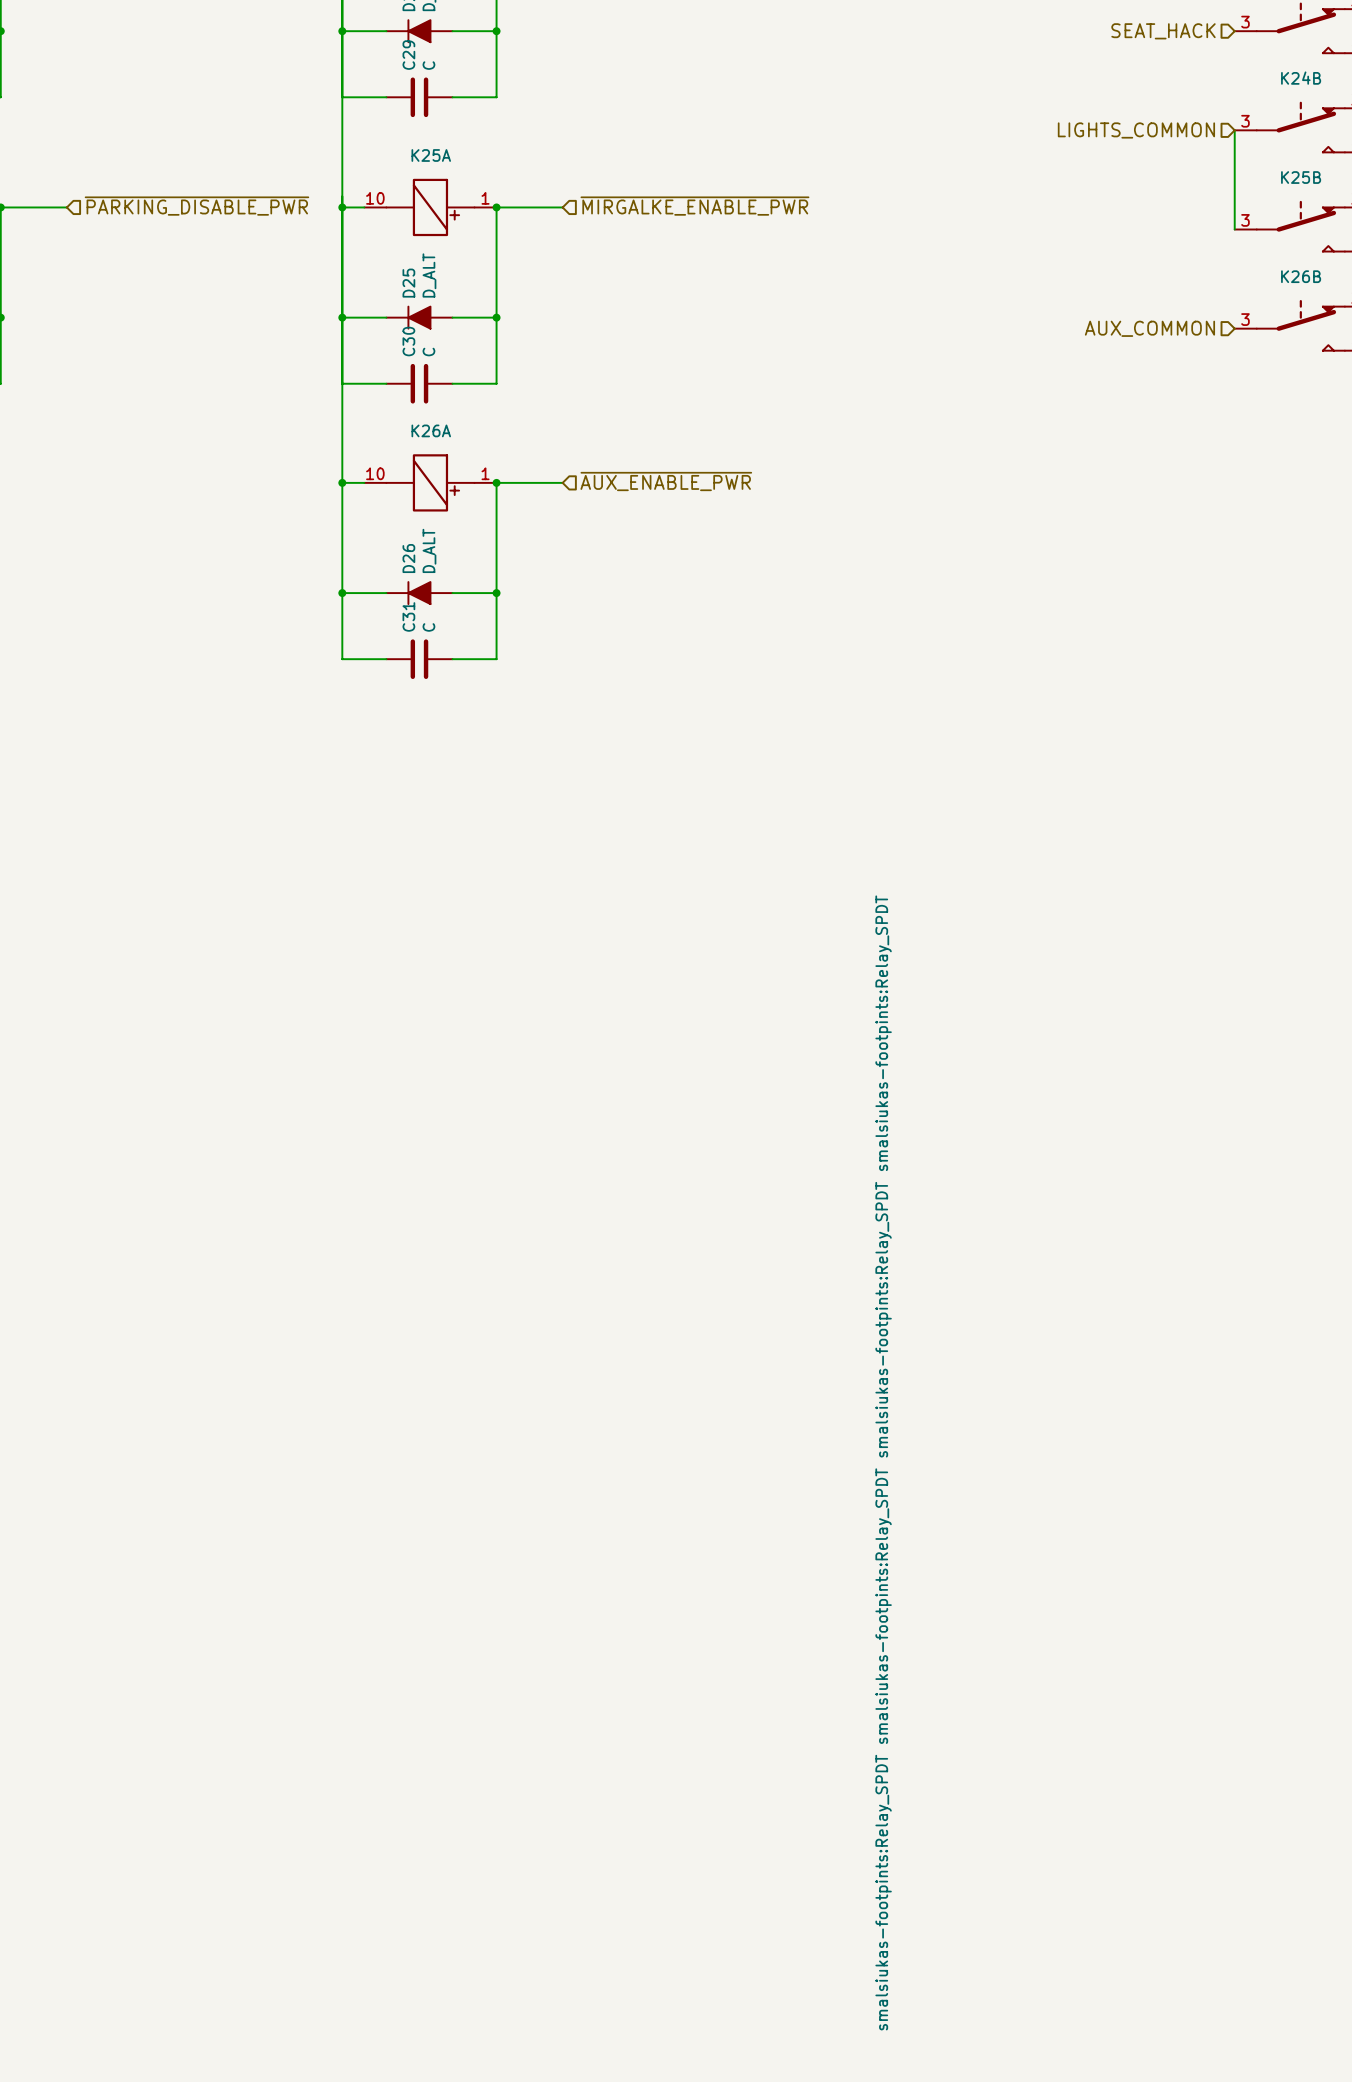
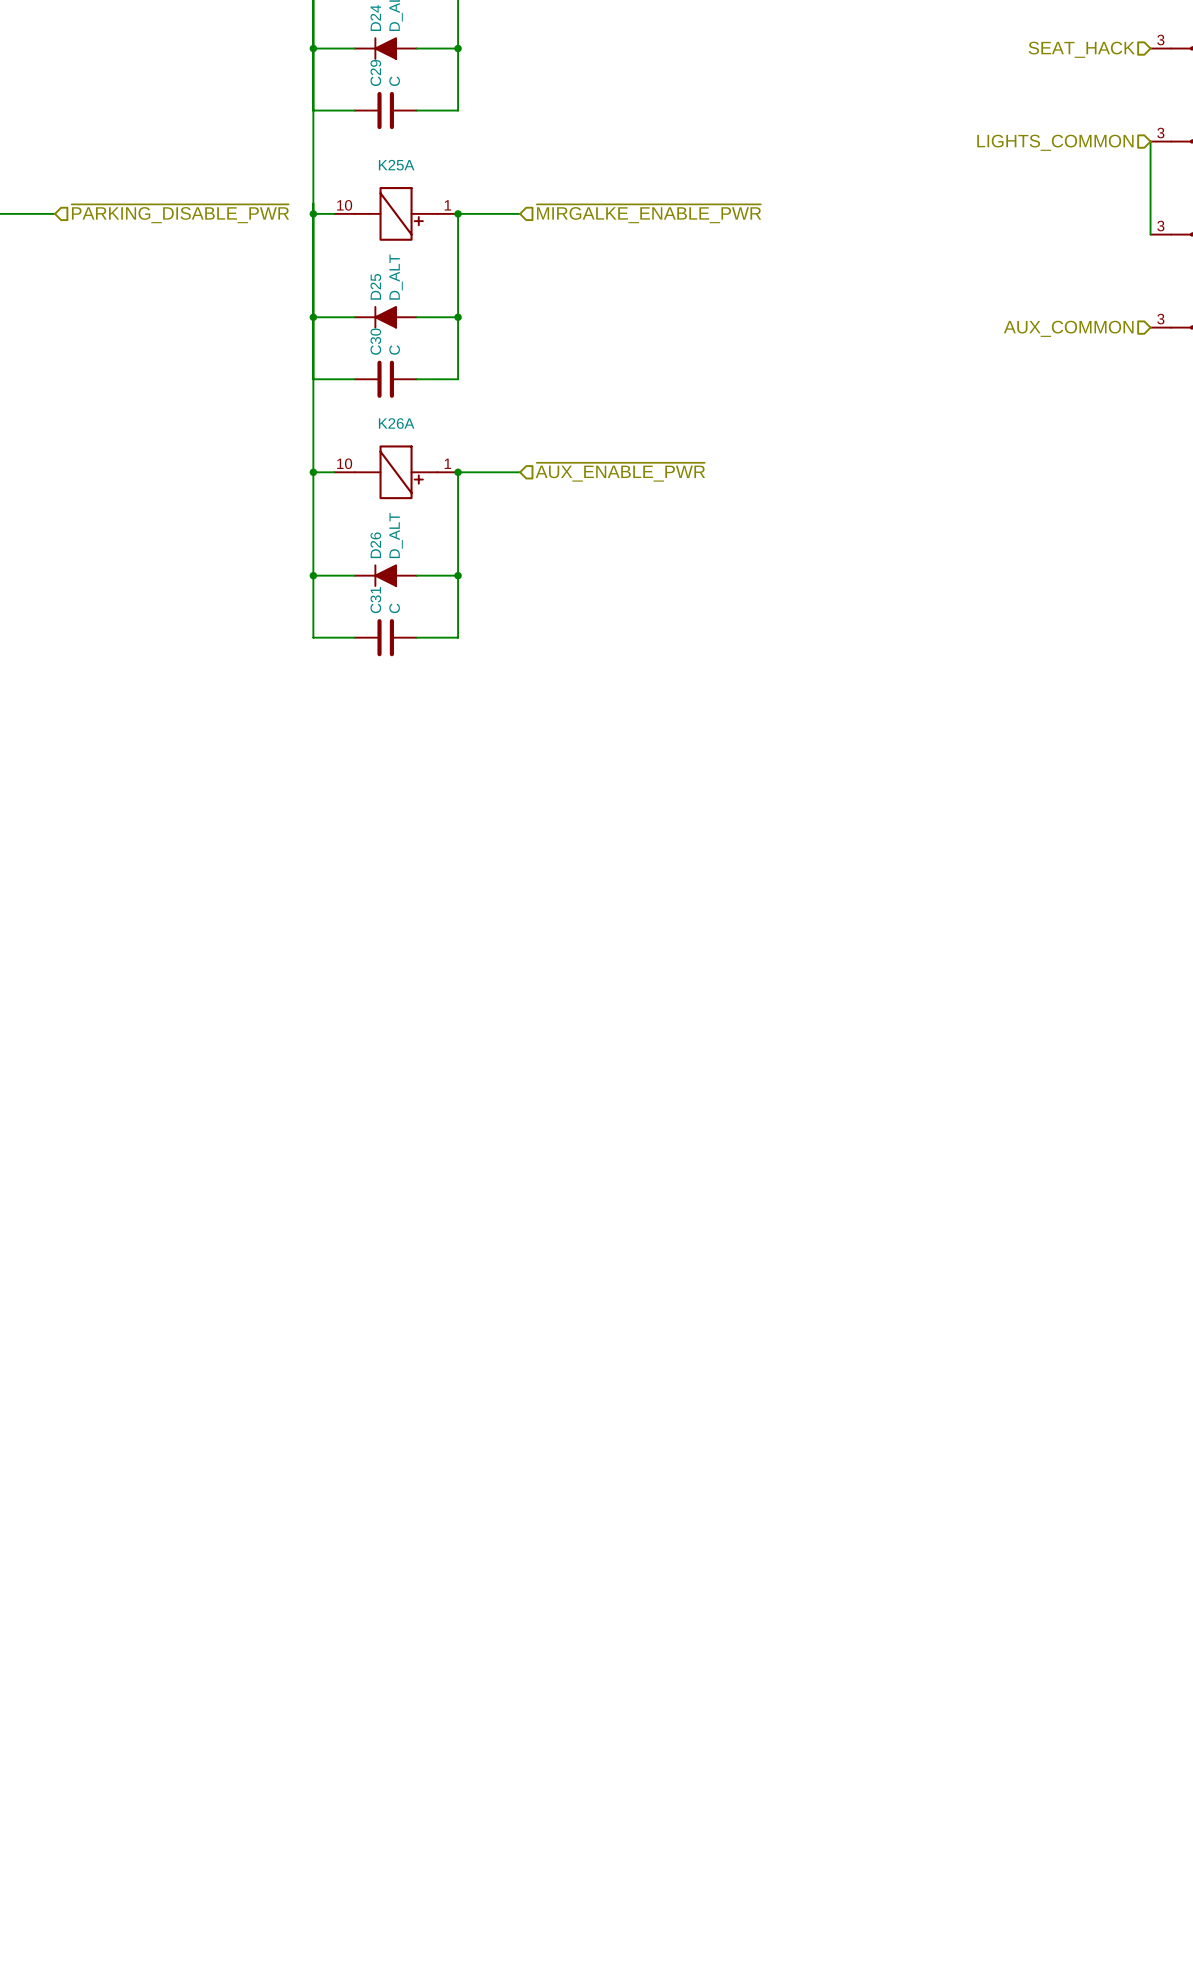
part text: smalsiukas-footpints:Relay_SPDT (883, 1033) -> none
part text: smalsiukas-footpints:Relay_SPDT (883, 1319) -> none
part text: smalsiukas-footpints:Relay_SPDT (883, 1606) -> none
part text: smalsiukas-footpints:Relay_SPDT (883, 1892) -> none

